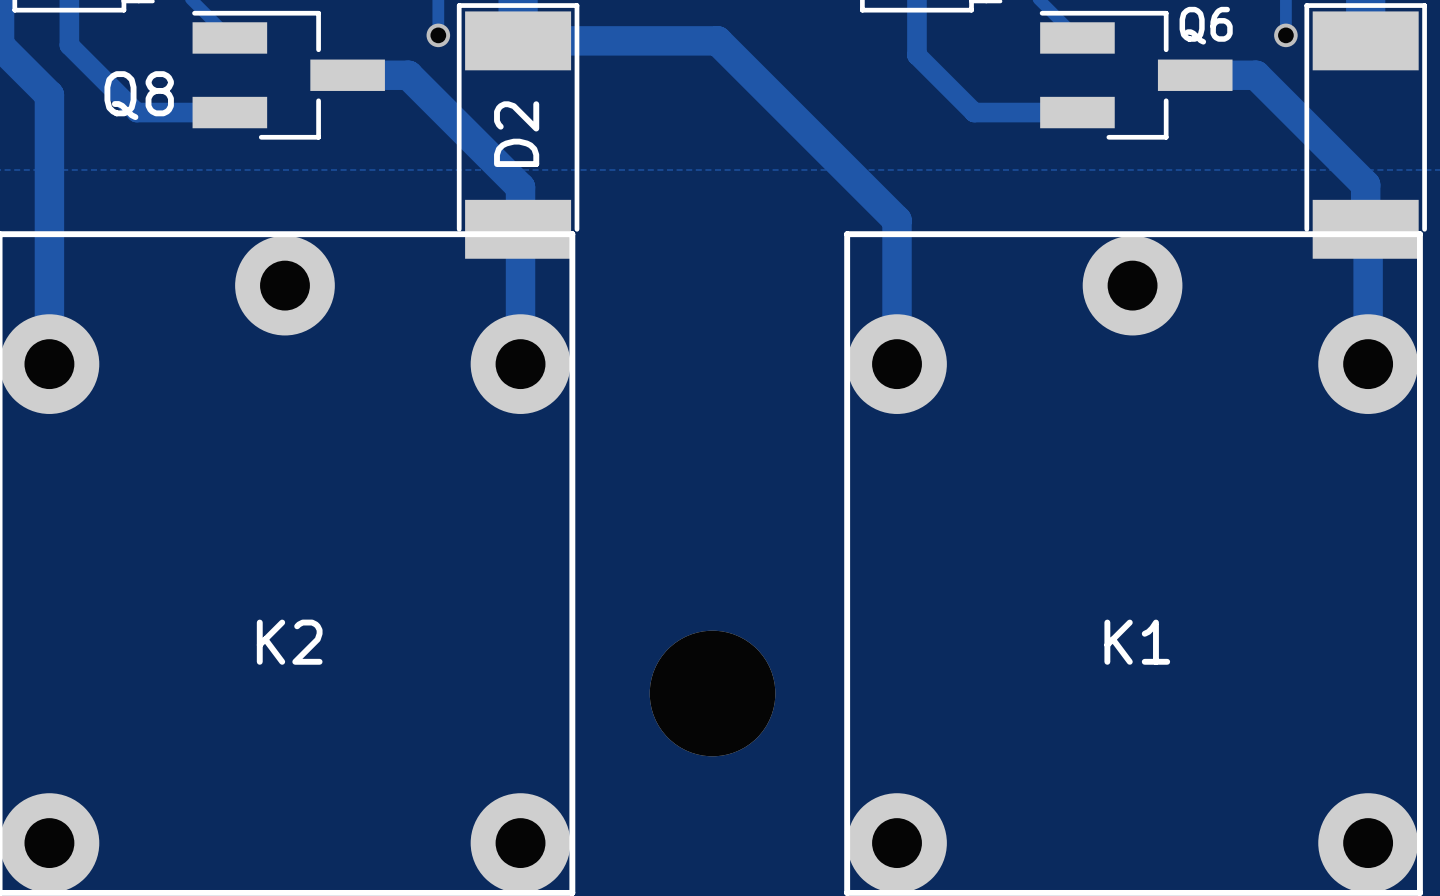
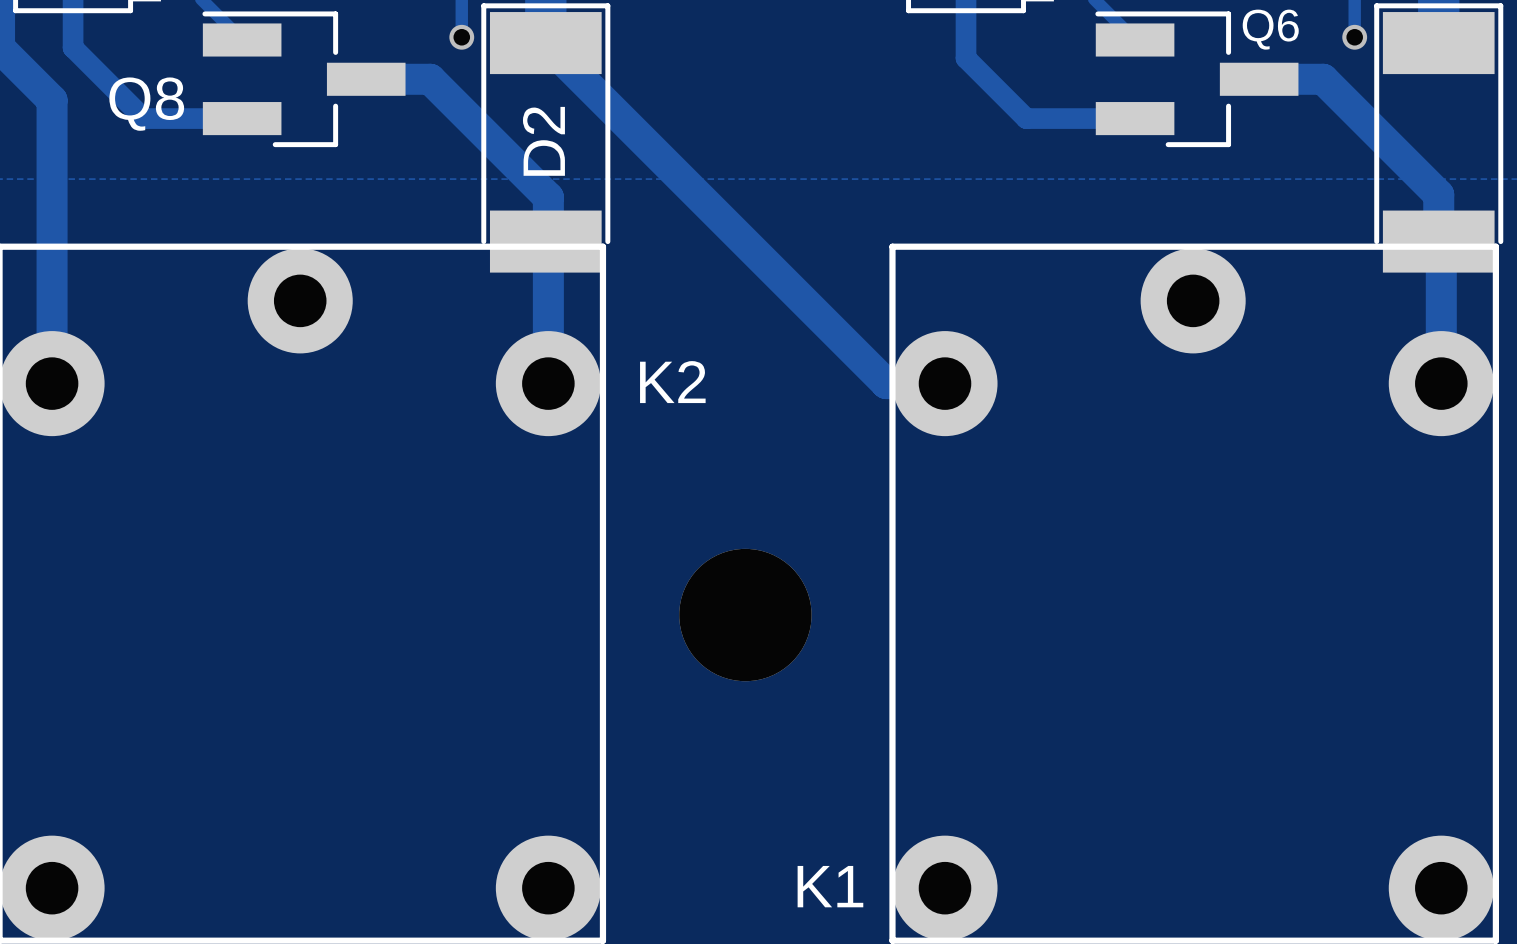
track: (518, 40) (717, 40) (897, 220) (897, 364) -> (545, 43) (886, 383) (945, 383)
K2 name position: K2 (289, 642) -> K2 (672, 382)
K1 name position: K1 (1137, 642) -> K1 (830, 886)
part position: (712, 693) -> (745, 615)

